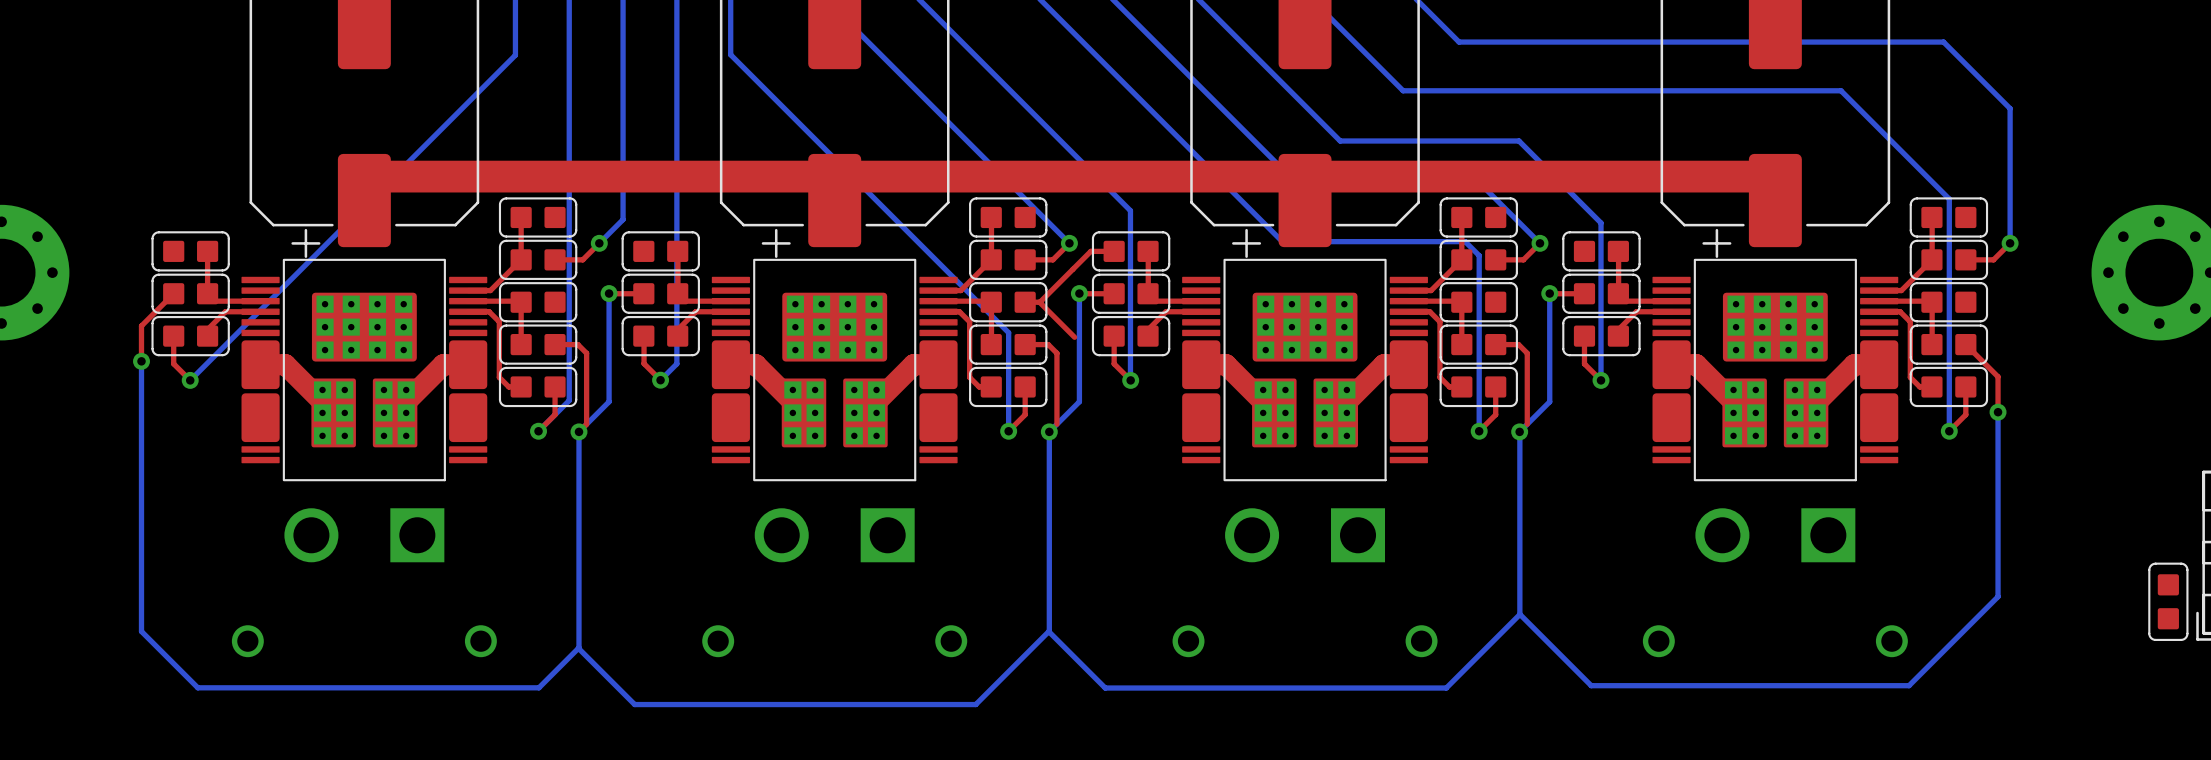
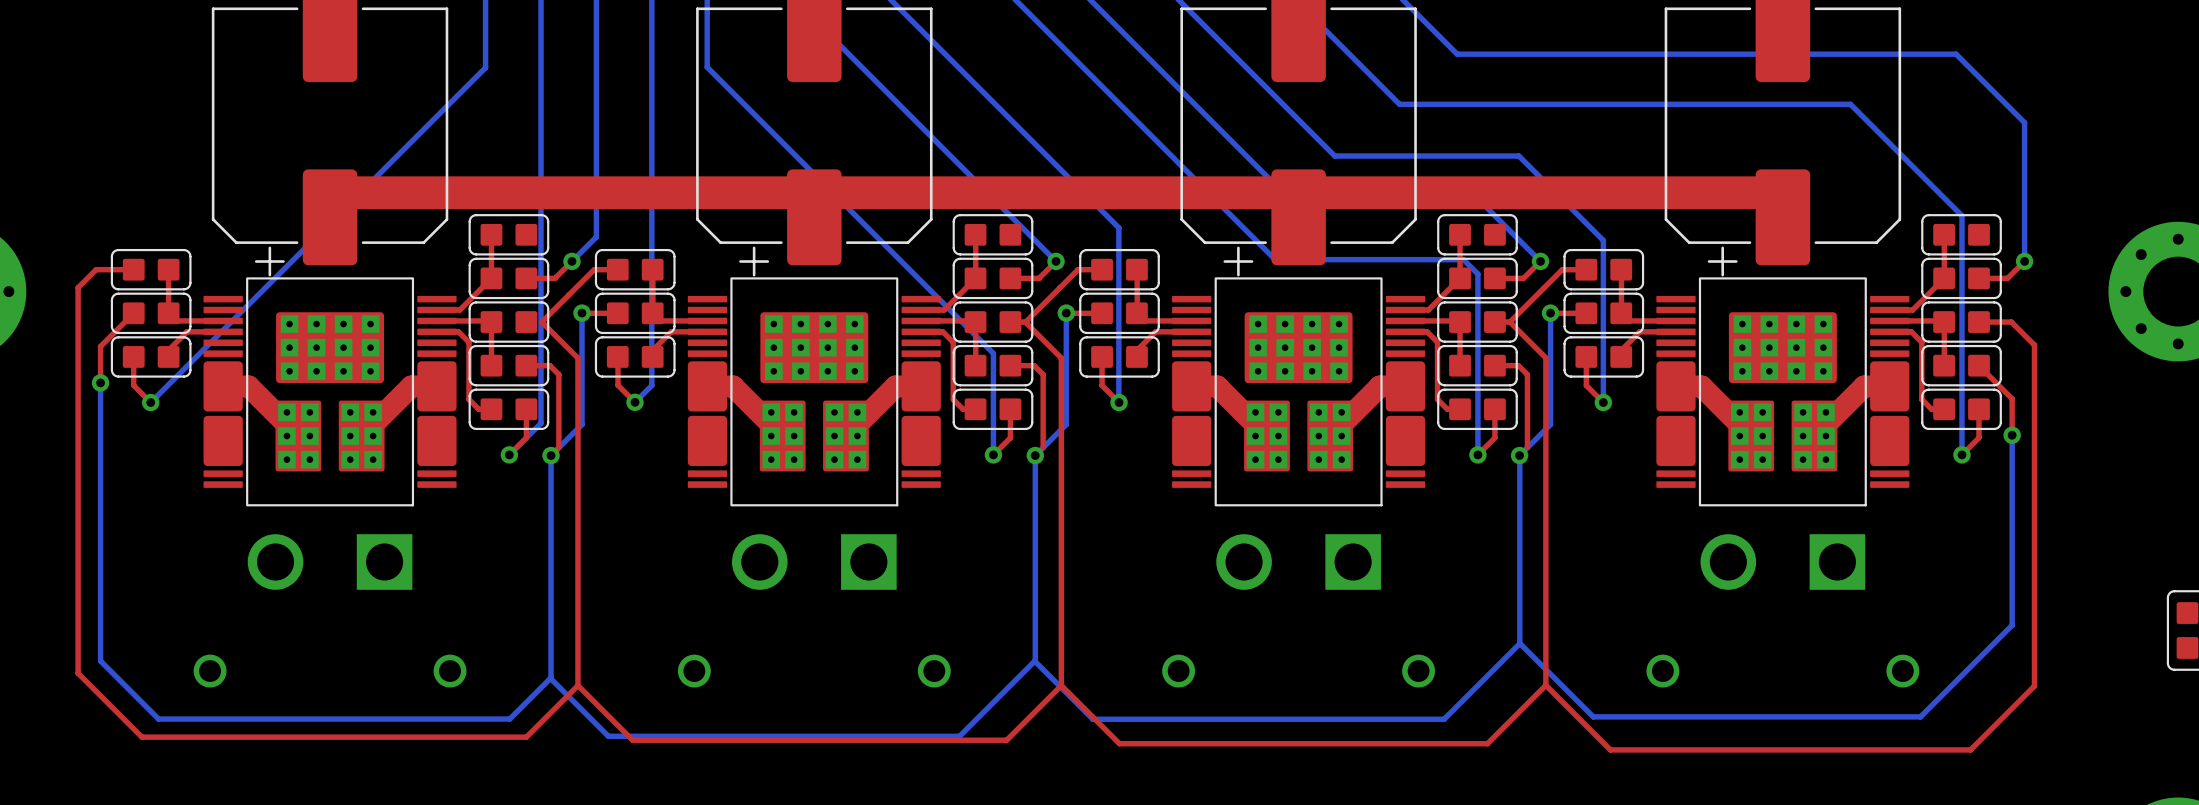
top track: none -> (133, 269) (96, 269) (78, 287) (78, 673) (142, 737) (526, 737) (577, 685)
top track: none -> (618, 269) (594, 269) (541, 322) (577, 358) (577, 685)
top track: none -> (1586, 269) (1562, 269) (1509, 322) (1494, 322)
top track: none -> (1509, 321) (1545, 357) (1545, 685)
top track: none -> (1978, 322) (2011, 322) (2034, 345) (2034, 686) (1970, 749) (1610, 749) (1545, 685)
top track: none -> (1061, 358) (1061, 685)
top track: none -> (577, 685) (632, 740) (1006, 740) (1061, 685)
top track: none -> (1061, 685) (1119, 743) (1487, 743) (1545, 685)

